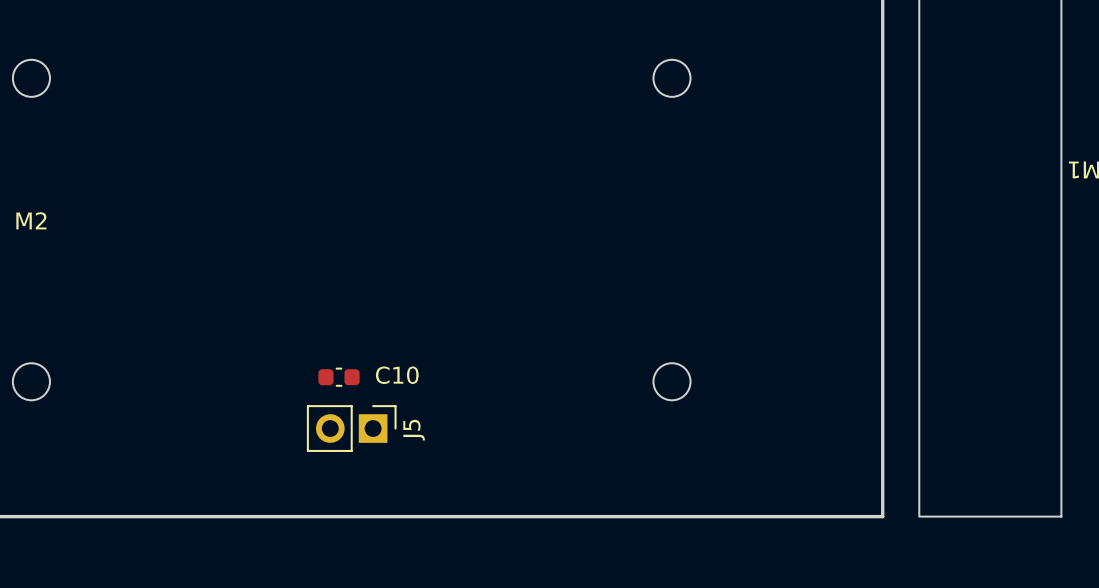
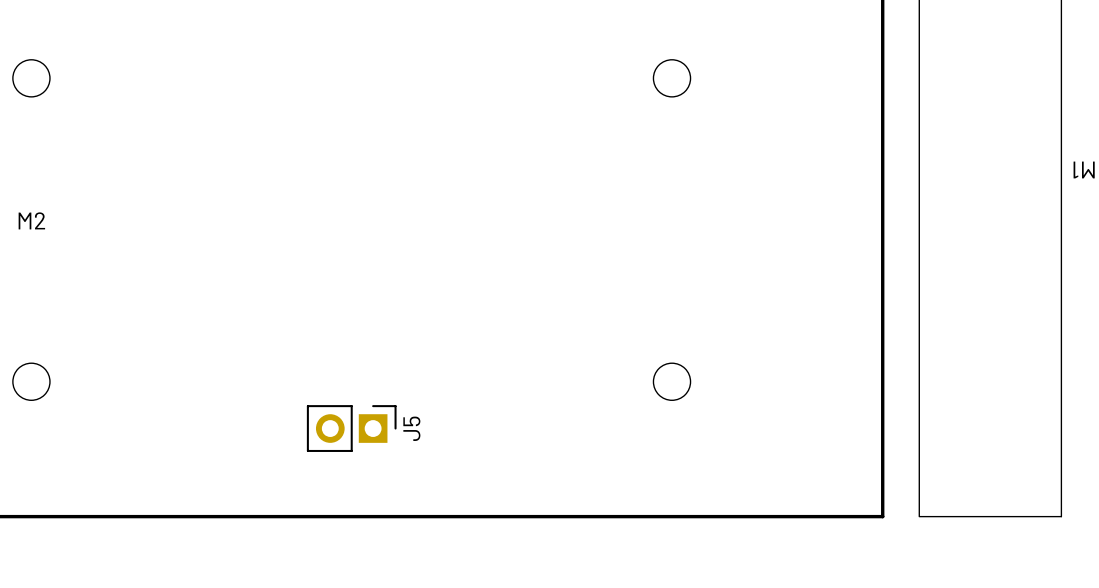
C10: (338, 377) -> none

